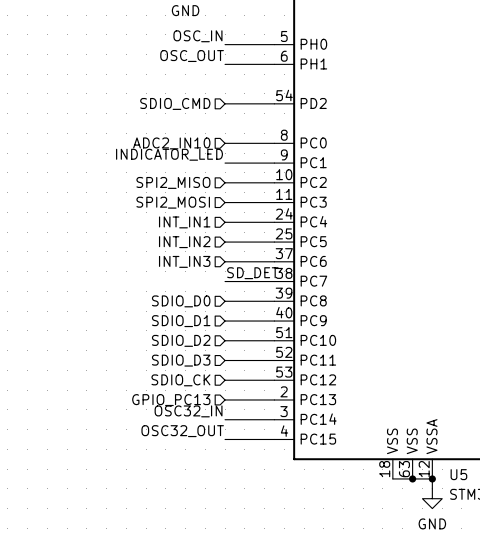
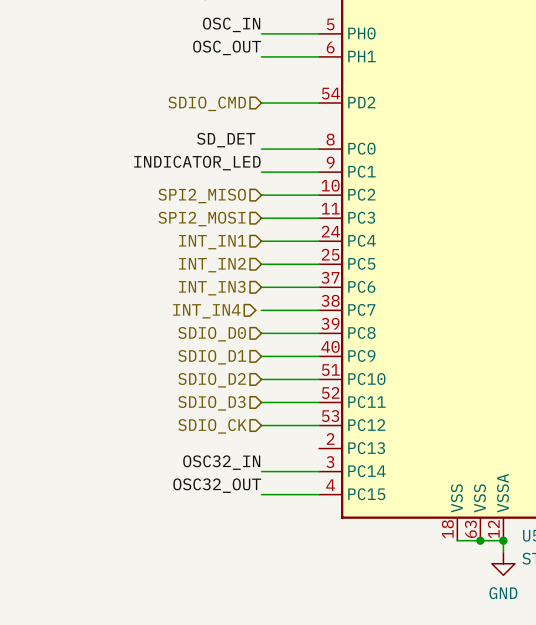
hierarchical label: ADC2_IN10 (171, 143) -> none
label position: SD_DET (252, 273) -> SD_DET (226, 140)
hierarchical label: none -> INT_IN4 (206, 311)
wire: (225, 399) (274, 399) -> none
hierarchical label: GPIO_PC13 (171, 400) -> none

